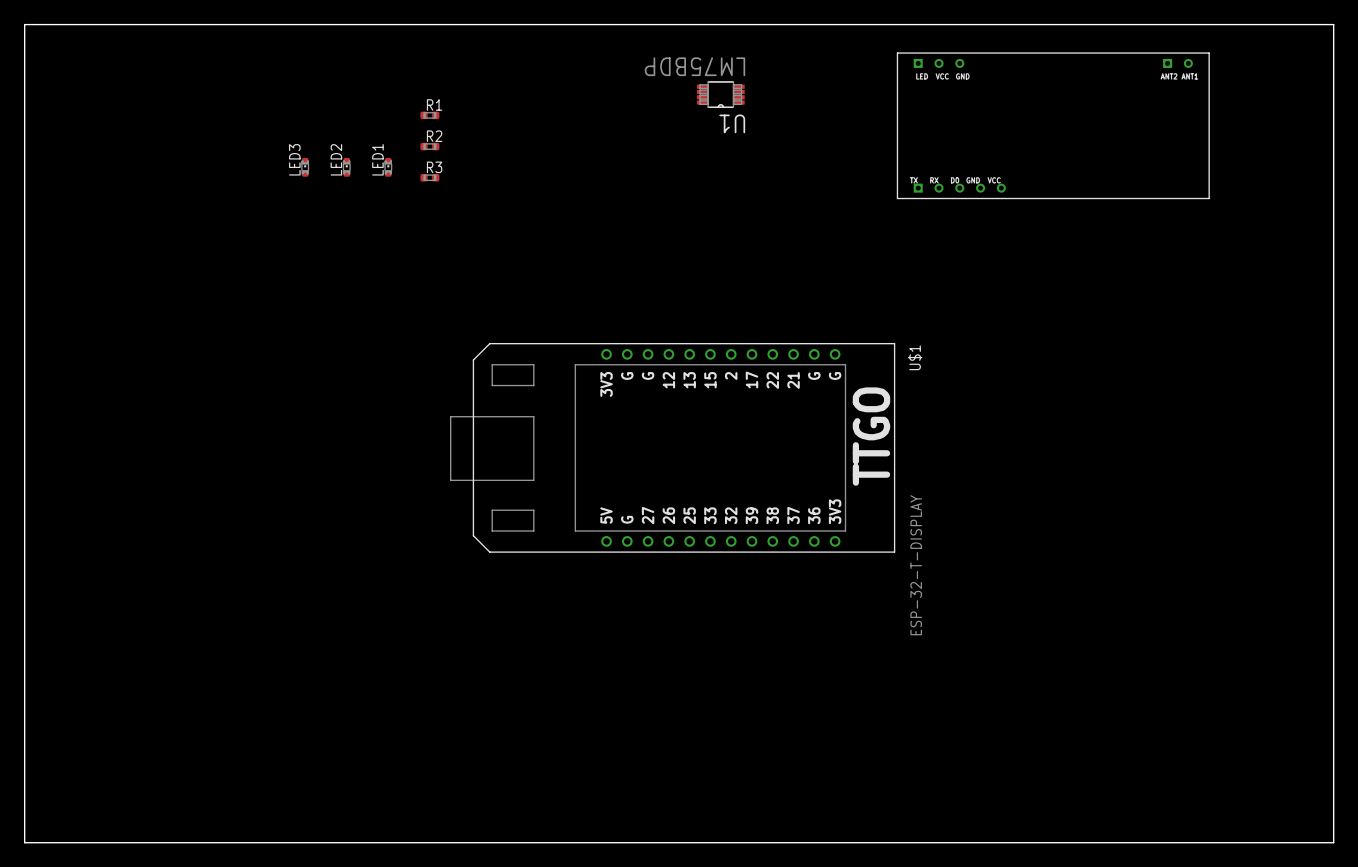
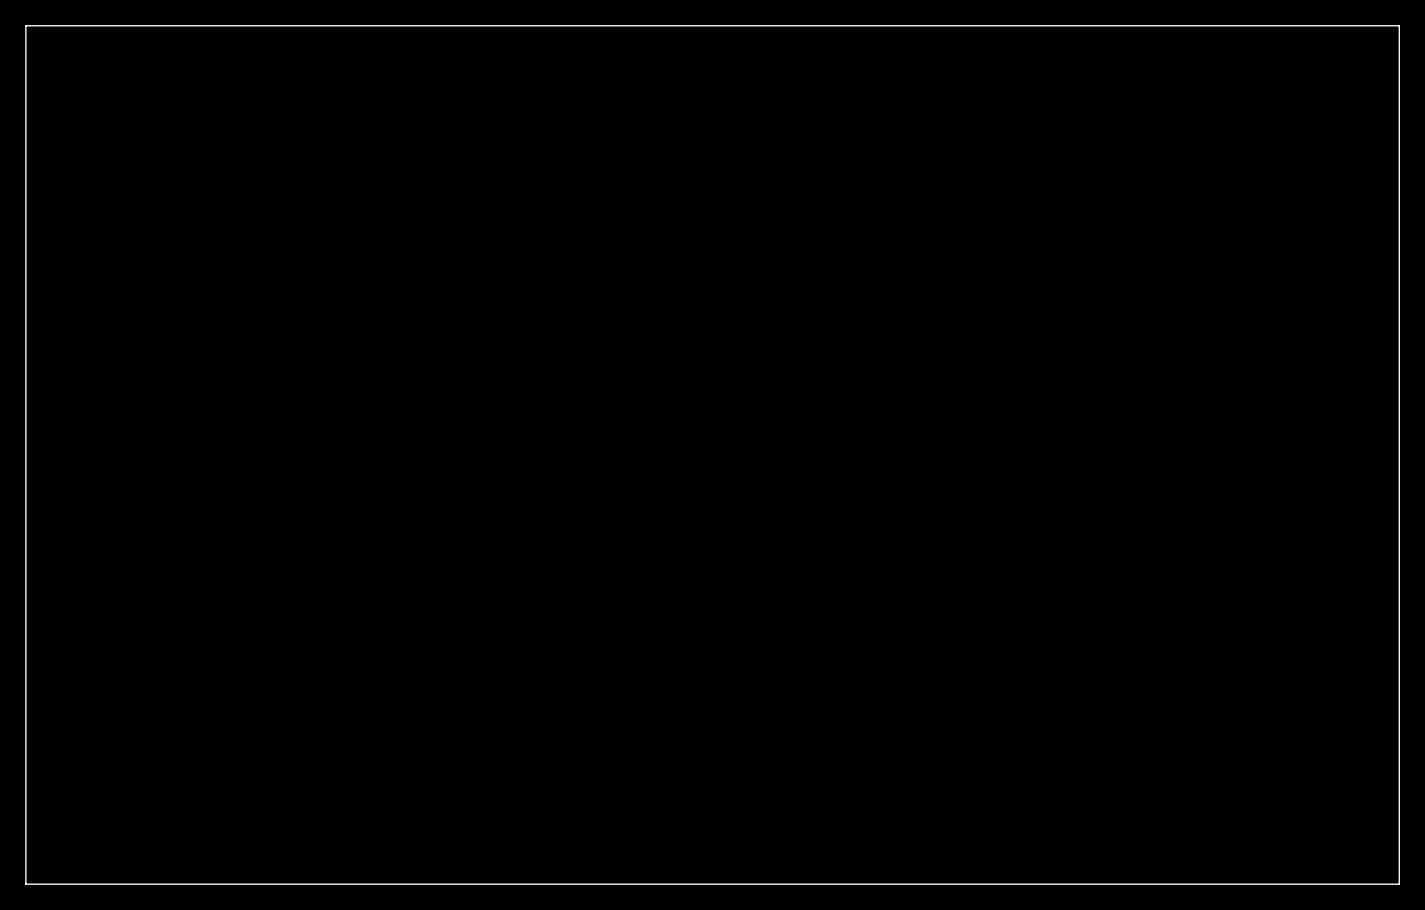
U1: LM75BDP (720, 94) -> none
R1: (429, 115) -> none
part: (1053, 125) -> none
R2: (429, 146) -> none
LED3: (305, 167) -> none
LED2: (346, 167) -> none
LED1: (388, 167) -> none
R3: (429, 177) -> none
U$1: ESP-32-T-DISPLAY (672, 447) -> none

